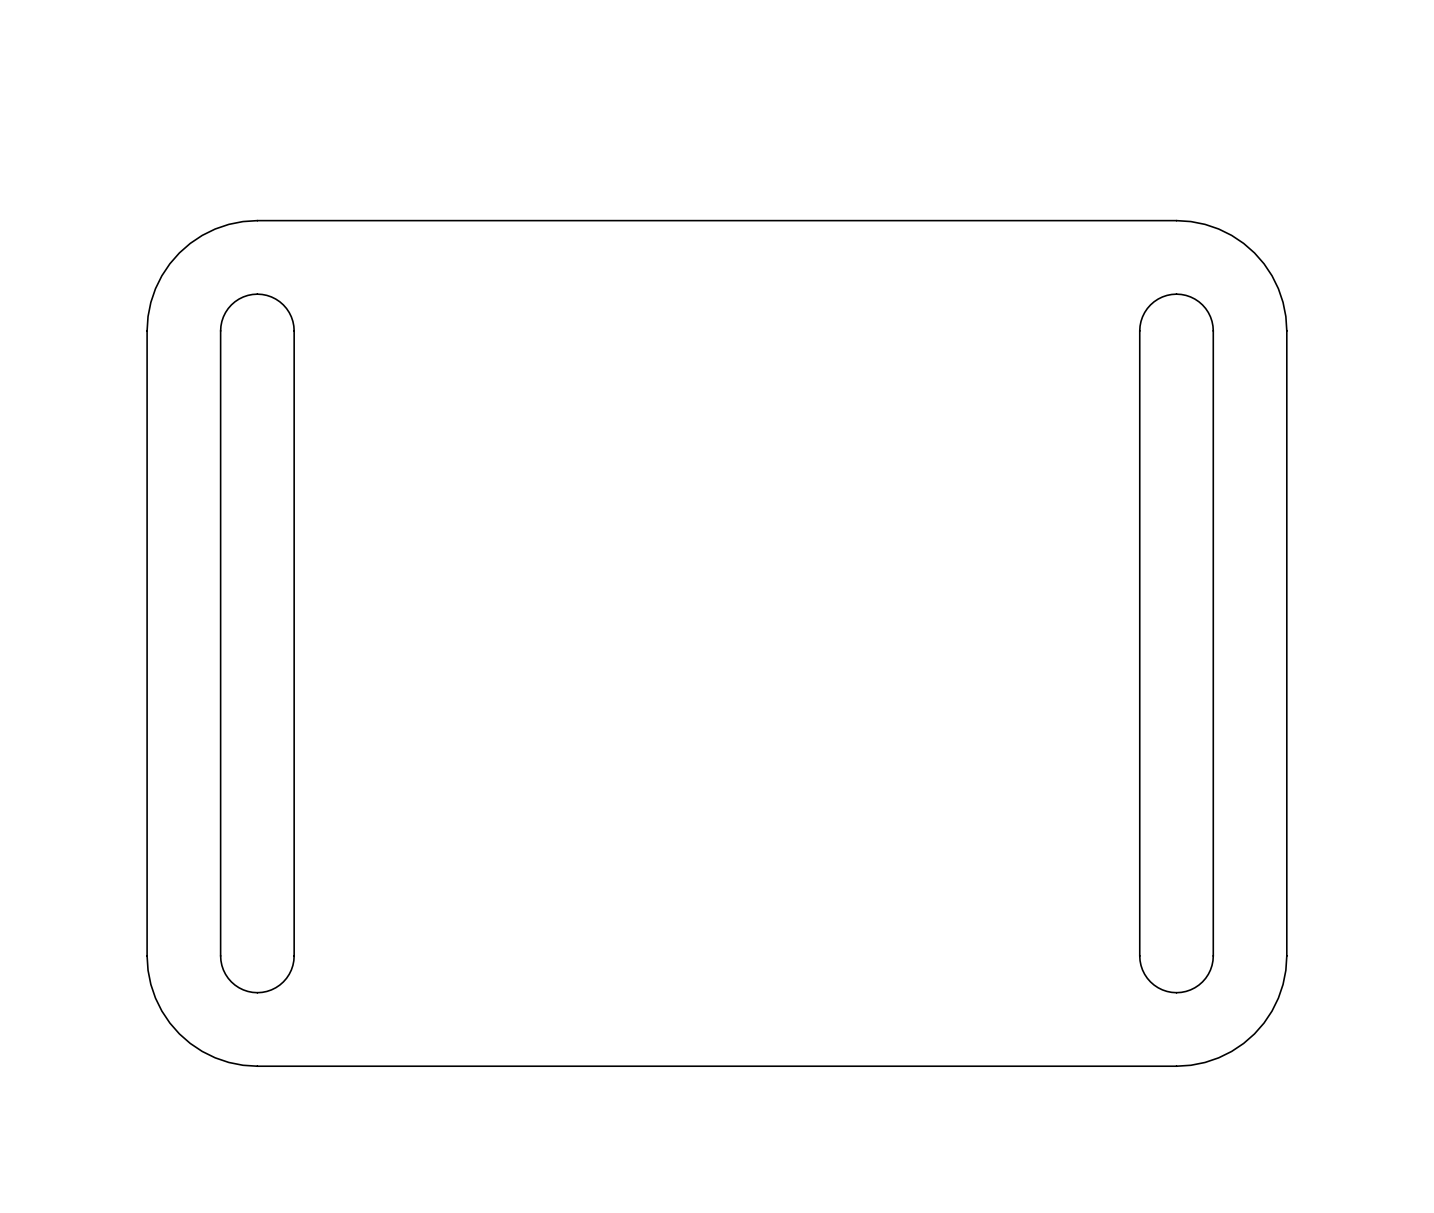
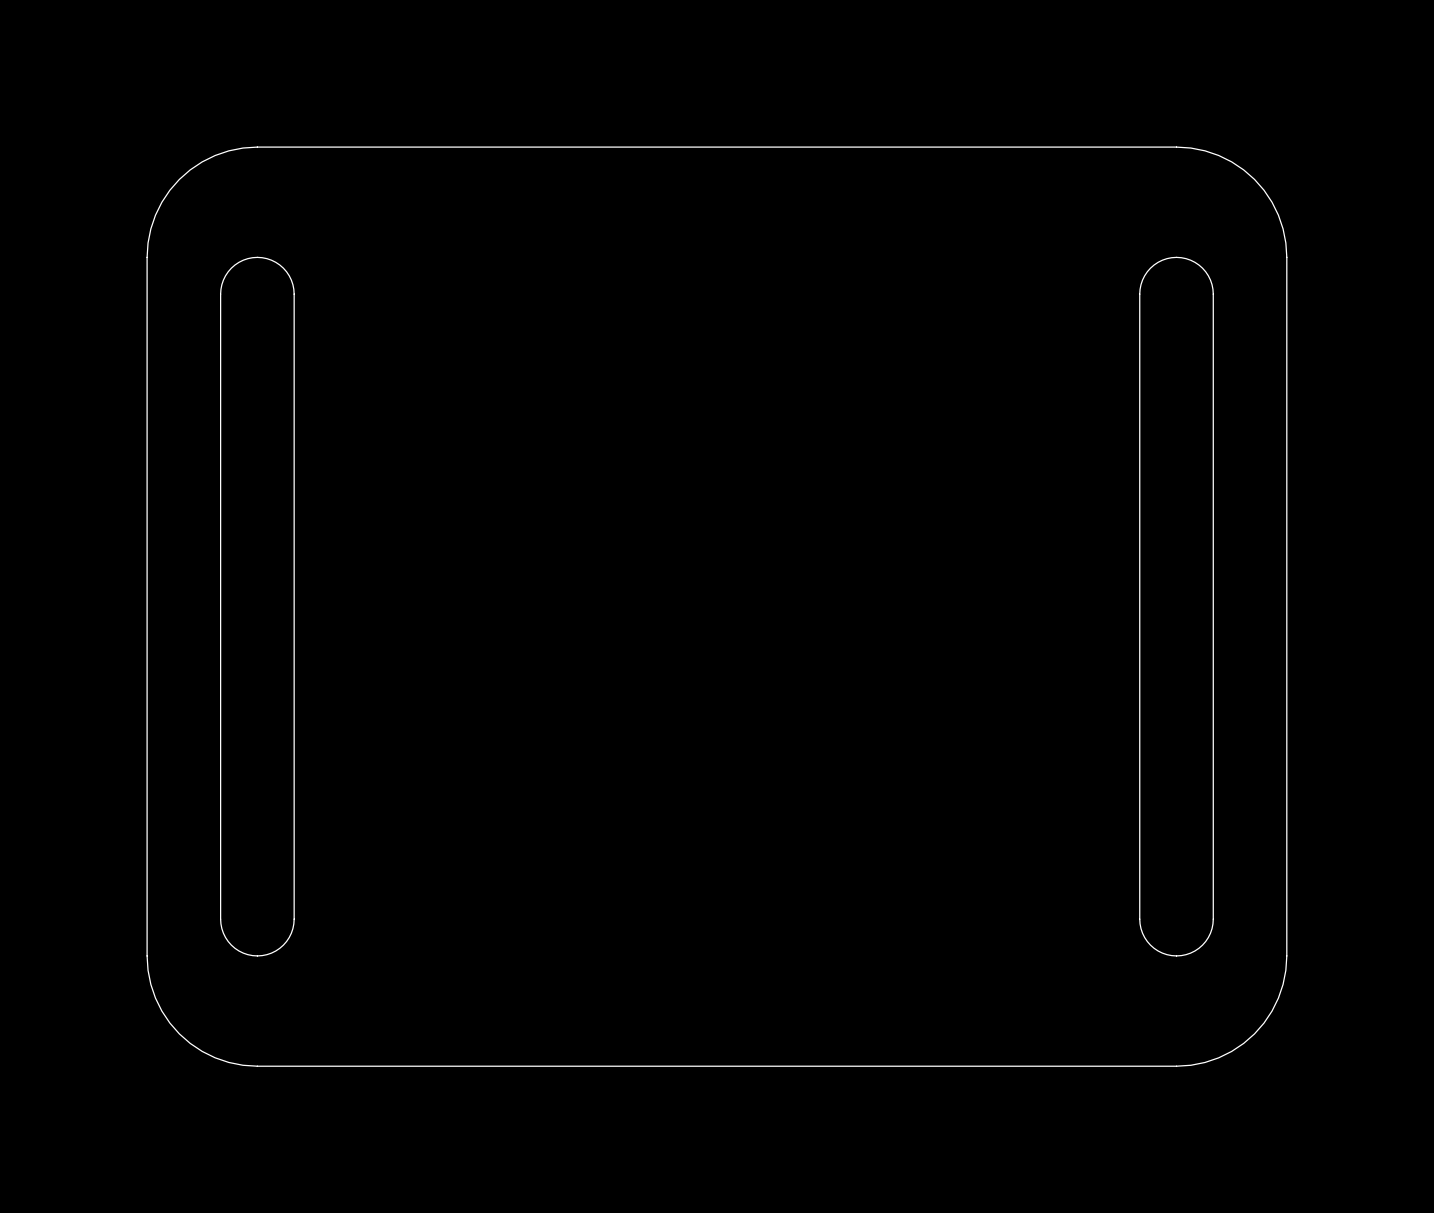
board edge: (294, 330) (291, 316) (283, 304) (271, 296) (257, 294) (243, 296) (231, 304) (223, 316) (220, 330) -> (294, 330) (293, 289) (289, 275) (275, 262) (257, 257) (239, 262) (225, 275) (220, 289) (220, 330)
board edge: (1213, 330) (1210, 316) (1202, 304) (1190, 296) (1176, 294) (1162, 296) (1150, 304) (1142, 316) (1139, 330) -> (1213, 330) (1212, 289) (1208, 275) (1194, 262) (1176, 257) (1158, 262) (1144, 275) (1140, 289) (1139, 330)
board edge: (1286, 330) (1283, 302) (1278, 288) (1264, 263) (1254, 252) (1243, 243) (1218, 229) (1205, 224) (1176, 220) (242, 221) (228, 224) (202, 235) (190, 243) (169, 263) (161, 275) (150, 302) (147, 330) -> (1286, 330) (1285, 242) (1283, 228) (1272, 202) (1254, 179) (1231, 161) (1205, 150) (1176, 147) (242, 148) (215, 155) (190, 169) (169, 190) (161, 202) (150, 228) (148, 242) (147, 330)
board edge: (294, 919) (293, 960) (289, 974) (275, 987) (257, 992) (239, 987) (225, 974) (220, 960) (220, 919) -> (294, 919) (291, 933) (283, 945) (271, 953) (257, 955) (243, 953) (231, 945) (223, 933) (220, 919)
board edge: (1213, 919) (1212, 960) (1208, 974) (1194, 987) (1176, 992) (1158, 987) (1144, 974) (1140, 960) (1139, 919) -> (1213, 919) (1210, 933) (1202, 945) (1190, 953) (1176, 955) (1162, 953) (1150, 945) (1142, 933) (1139, 919)

